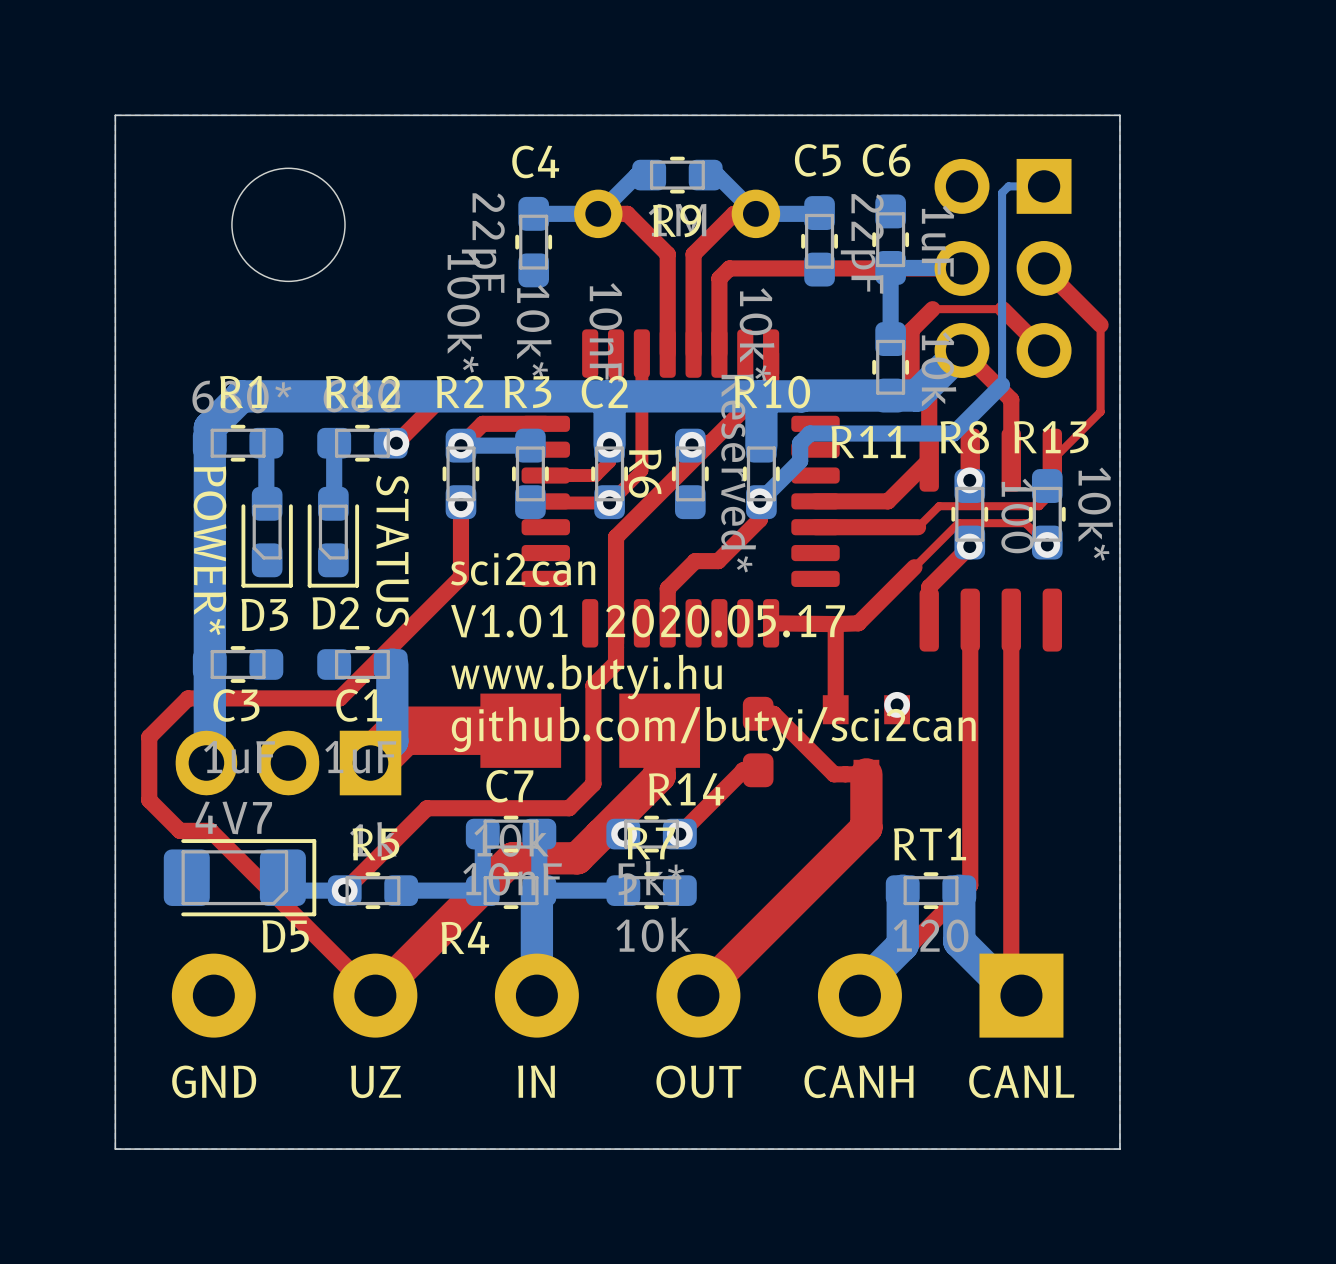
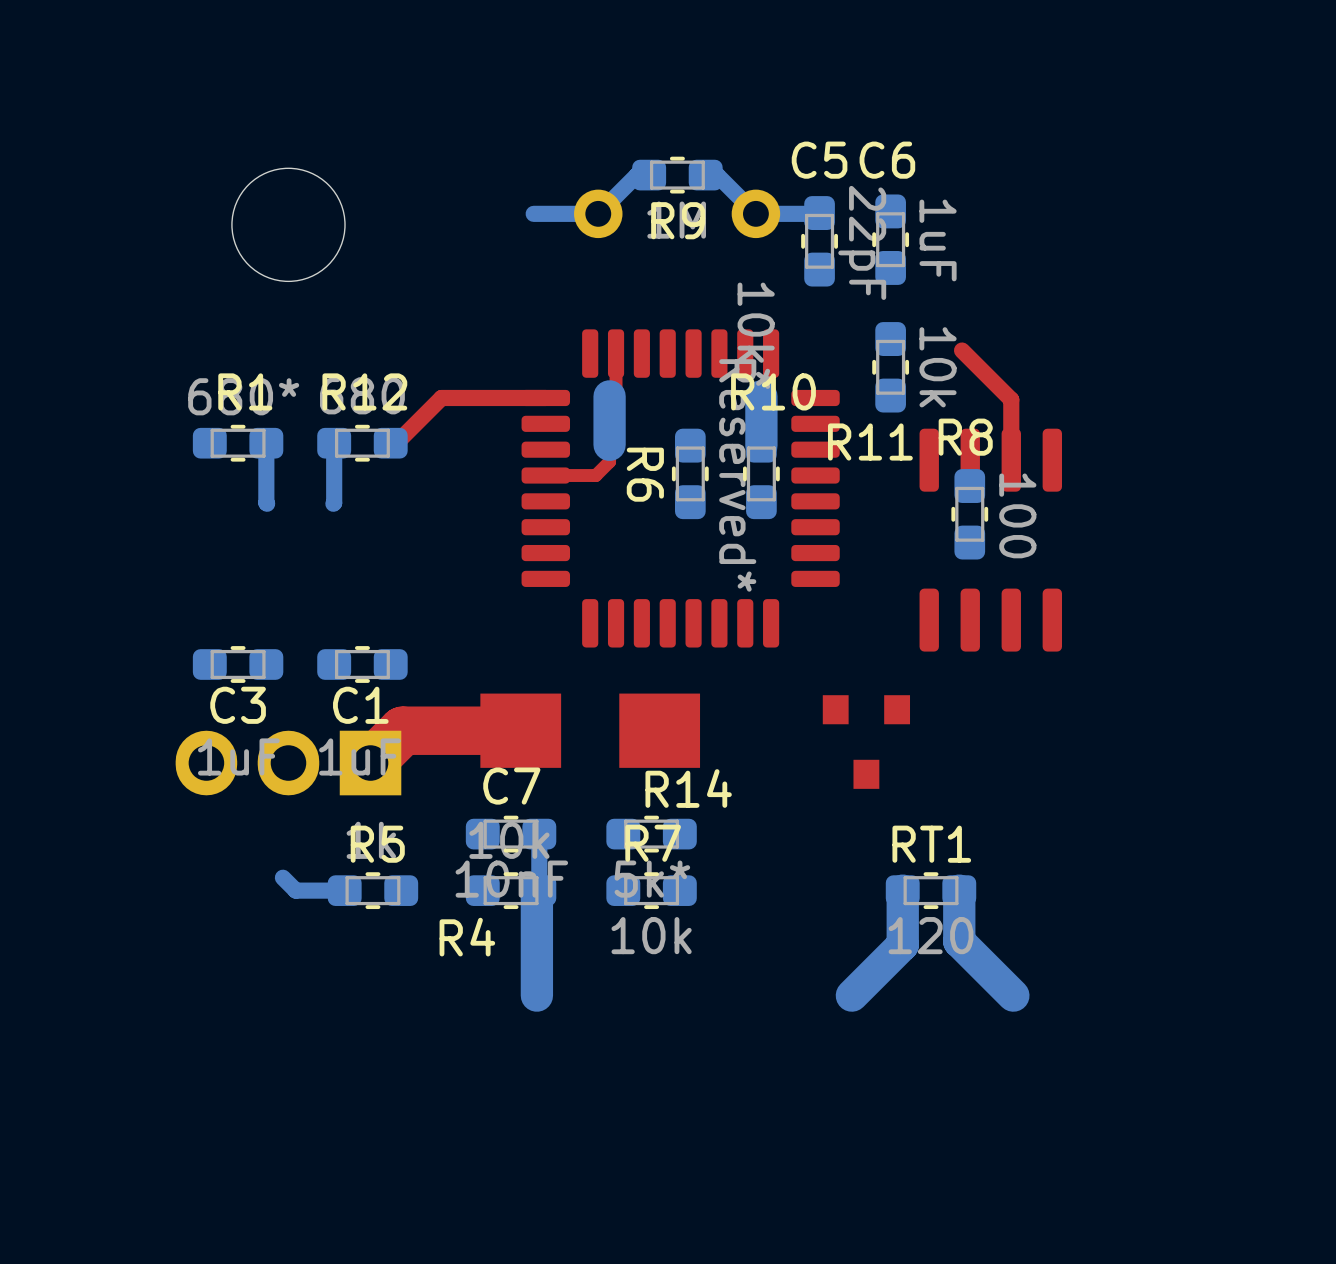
board edge: (1119, 115) (1119, 1149) (115, 1149) (115, 115) (1119, 115) -> none
bottom track: (1044, 186) (1008, 186) (1002, 192) (1002, 385) (953, 433) (809, 433) (800, 443) (800, 460) (759, 501) -> none
top track: (598, 213) (627, 213) (667, 254) (667, 353) -> none
top track: (755, 213) (733, 213) (693, 254) (693, 353) -> none
C4: 22pF (533, 242) -> none
bottom track: (962, 268) (890, 267) (890, 339) -> none
top track: (962, 268) (729, 268) (719, 278) (719, 353) -> none
part: (1003, 268) -> none
top track: (1044, 268) (1100, 324) (1100, 411) (1052, 460) (1052, 493) (1039, 506) (939, 506) (918, 527) (815, 527) -> none
bottom track: (962, 350) (916, 395) (241, 396) (209, 427) (209, 758) (205, 763) -> none
top track: (1044, 350) (1002, 309) (932, 309) (911, 330) (911, 376) (929, 394) (929, 460) (888, 501) (815, 501) -> none
top track: (641, 353) (641, 470) (609, 502) (547, 502) (545, 501) -> none
top track: (771, 353) (771, 382) (616, 537) (616, 662) (593, 685) (593, 784) (569, 808) (427, 808) (344, 890) -> none
top track: (545, 423) (482, 423) (460, 445) -> none
via: (396, 443) -> none
via: (609, 444) -> none
via: (691, 444) -> none
via: (460, 445) -> none
bottom track: (530, 445) (460, 445) -> none
R2: 100k* (460, 473) -> none
R3: 10k* (530, 473) -> none
C2: 10nF (609, 473) -> none
via: (969, 480) -> none
top track: (759, 501) (759, 519) (718, 561) (695, 561) (667, 588) (667, 623) -> none
via: (759, 501) -> none
via: (609, 502) -> none
top track: (460, 504) (460, 577) (339, 698) (188, 698) (149, 737) (149, 800) (179, 830) (210, 830) (375, 995) (512, 858) (577, 858) (659, 775) (659, 730) -> none
via: (460, 504) -> none
R13: 10k* (1047, 514) -> none
D2: POWER* (267, 537) -> none
D3: STATUS (333, 537) -> none
top track: (1047, 544) (1025, 523) (958, 523) (858, 623) (835, 624) -> none
via: (1047, 544) -> none
top track: (969, 546) (929, 587) (929, 620) -> none
via: (969, 546) -> none
text: sci2can (523, 569) -> none
top track: (970, 620) (970, 885) (859, 995) -> none
top track: (1011, 620) (1011, 985) (1021, 995) -> none
text: V1.01 2020.05.17 (648, 621) -> none
top track: (771, 623) (835, 624) -> none
top track: (835, 624) (835, 709) -> none
bottom track: (392, 664) (392, 741) (370, 763) -> none
text: www.butyi.hu (586, 677) -> none
via: (897, 704) -> none
top track: (758, 713) (773, 713) (834, 774) (866, 774) (866, 827) (698, 995) -> none
text: github.com/butyi/sci2can (713, 729) -> none
part: (758, 742) -> none
top track: (743, 770) (679, 834) -> none
bottom track: (482, 834) (482, 890) (401, 890) -> none
via: (624, 834) -> none
via: (679, 834) -> none
D5: 4V7 (240, 877) -> none
via: (344, 890) -> none
bottom track: (623, 890) (539, 890) -> none
part: (617, 995) -> none
text: GND (214, 1081) -> none
text: UZ (376, 1081) -> none
text: IN (536, 1081) -> none
text: OUT (698, 1081) -> none
text: CANH (858, 1081) -> none
text: CANL (1021, 1081) -> none

